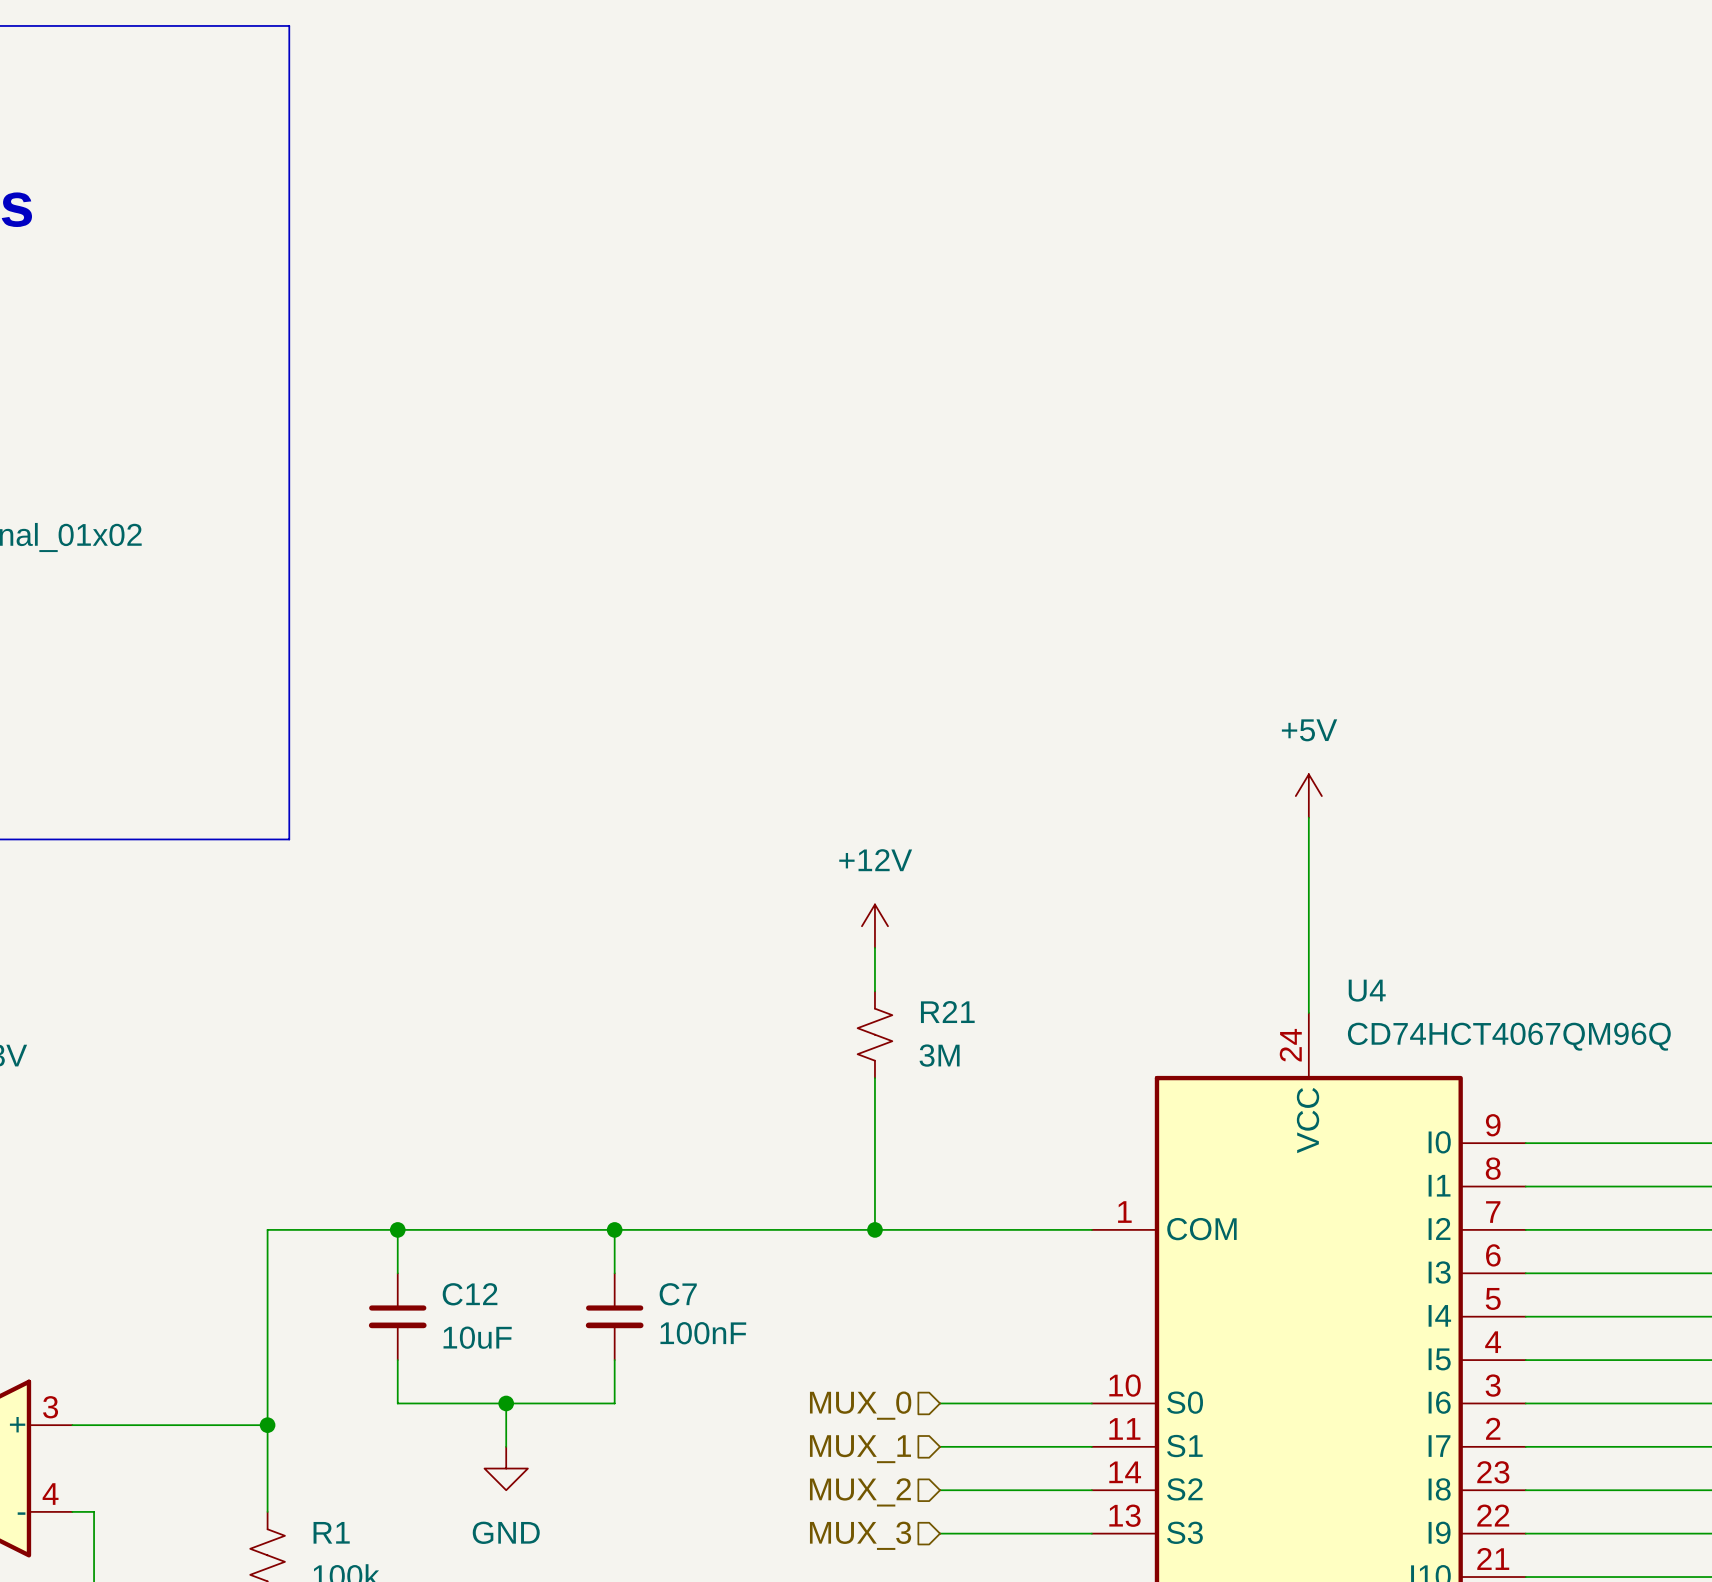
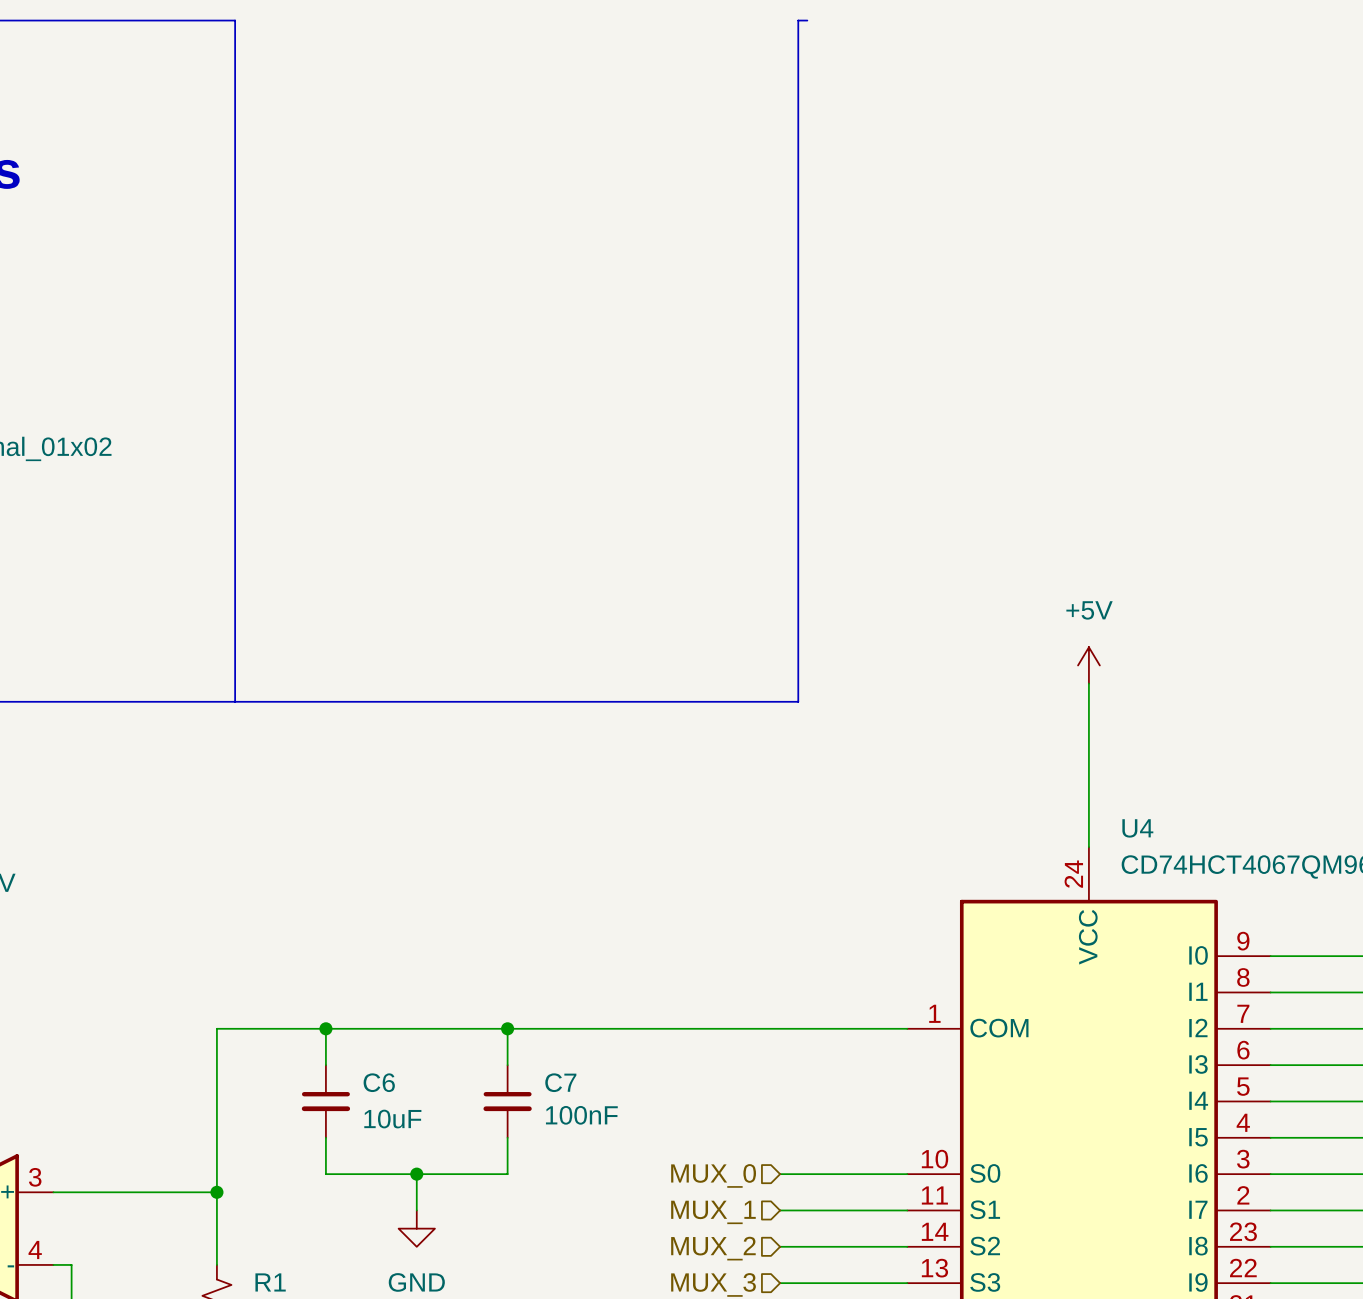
line: none -> (807, 20) (798, 20) (798, 701) (235, 701)
power symbol: +12V (874, 926) -> none
wire: (874, 947) (874, 991) -> none
R21: 3M (874, 1034) -> none
wire: (874, 1078) (874, 1229) -> none
junction: (874, 1229) -> none
C12 name: C12 (470, 1294) -> C6 (379, 1082)

